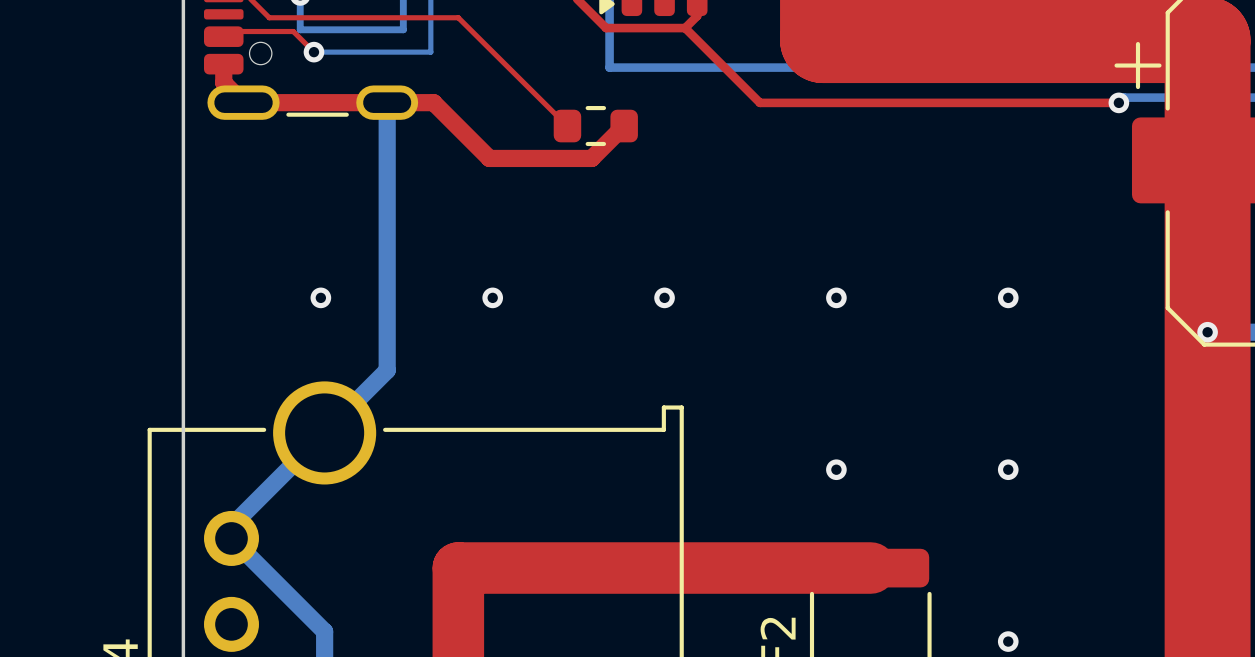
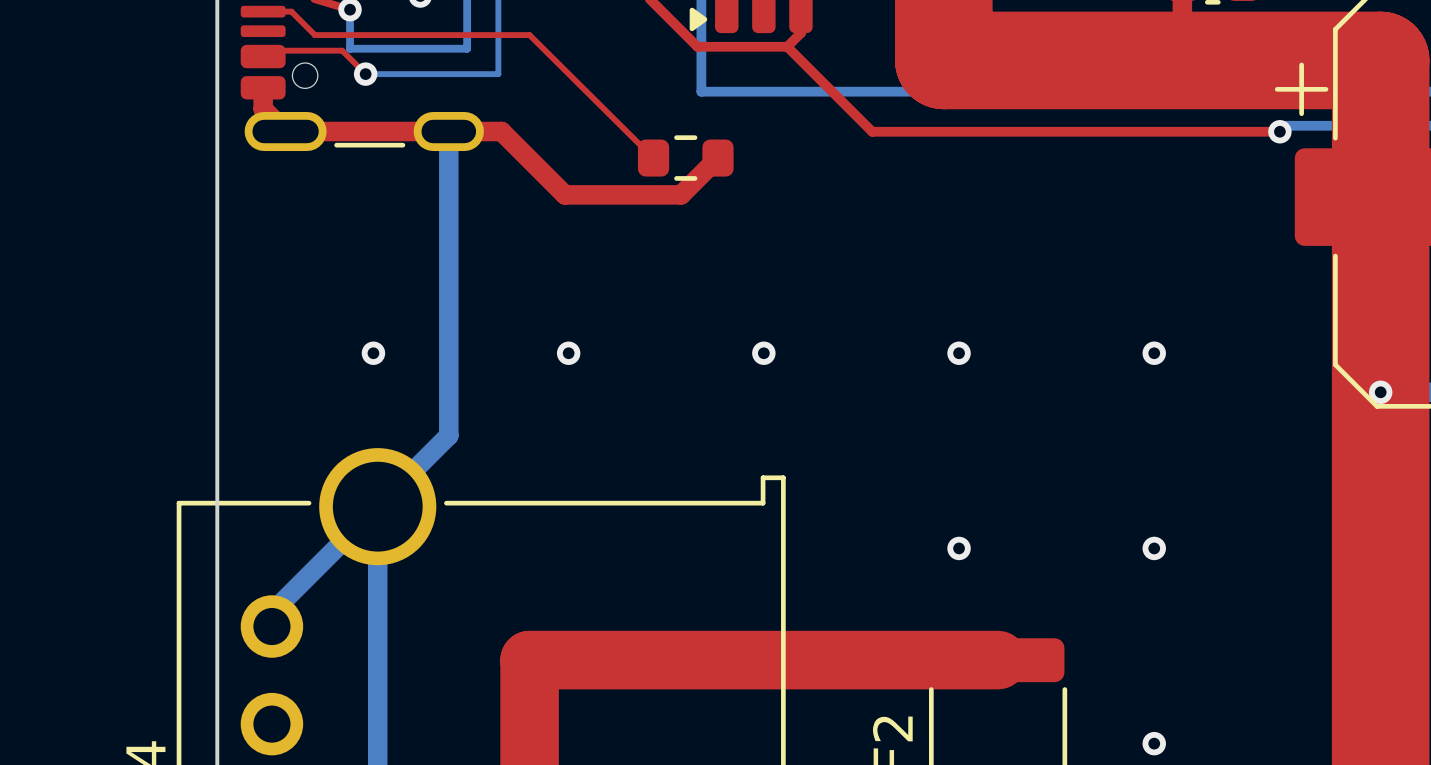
bottom track: (231, 538) (324, 631) -> (377, 506) (377, 732)

